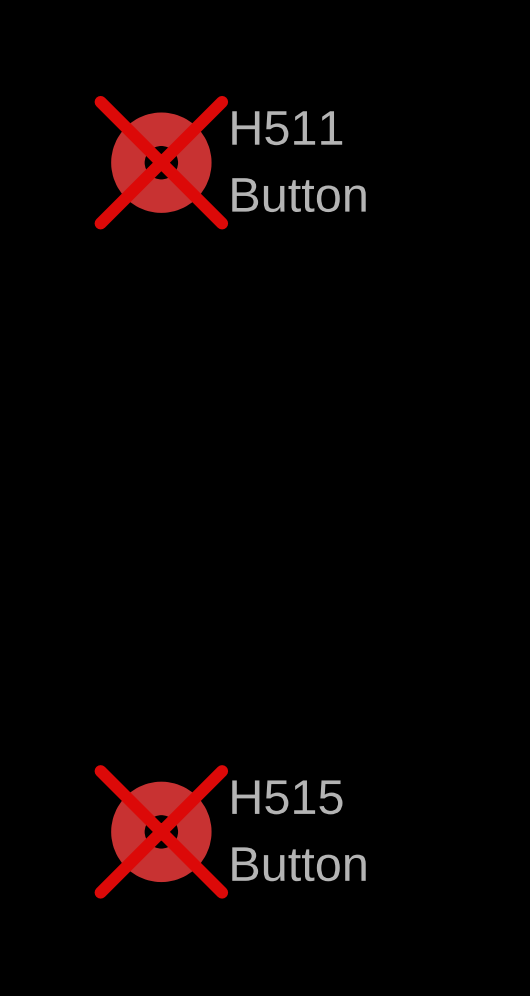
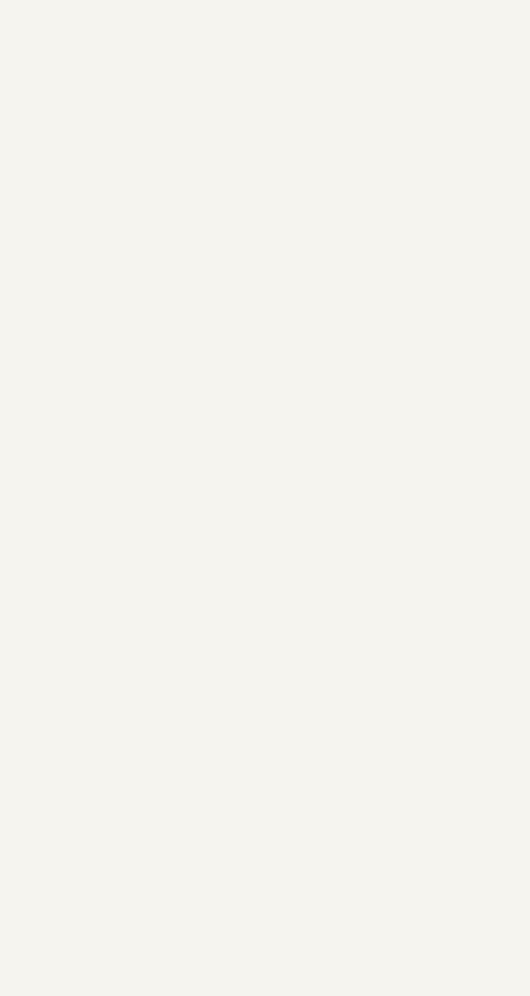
H511: Button (161, 162) -> none
H515: Button (161, 831) -> none

